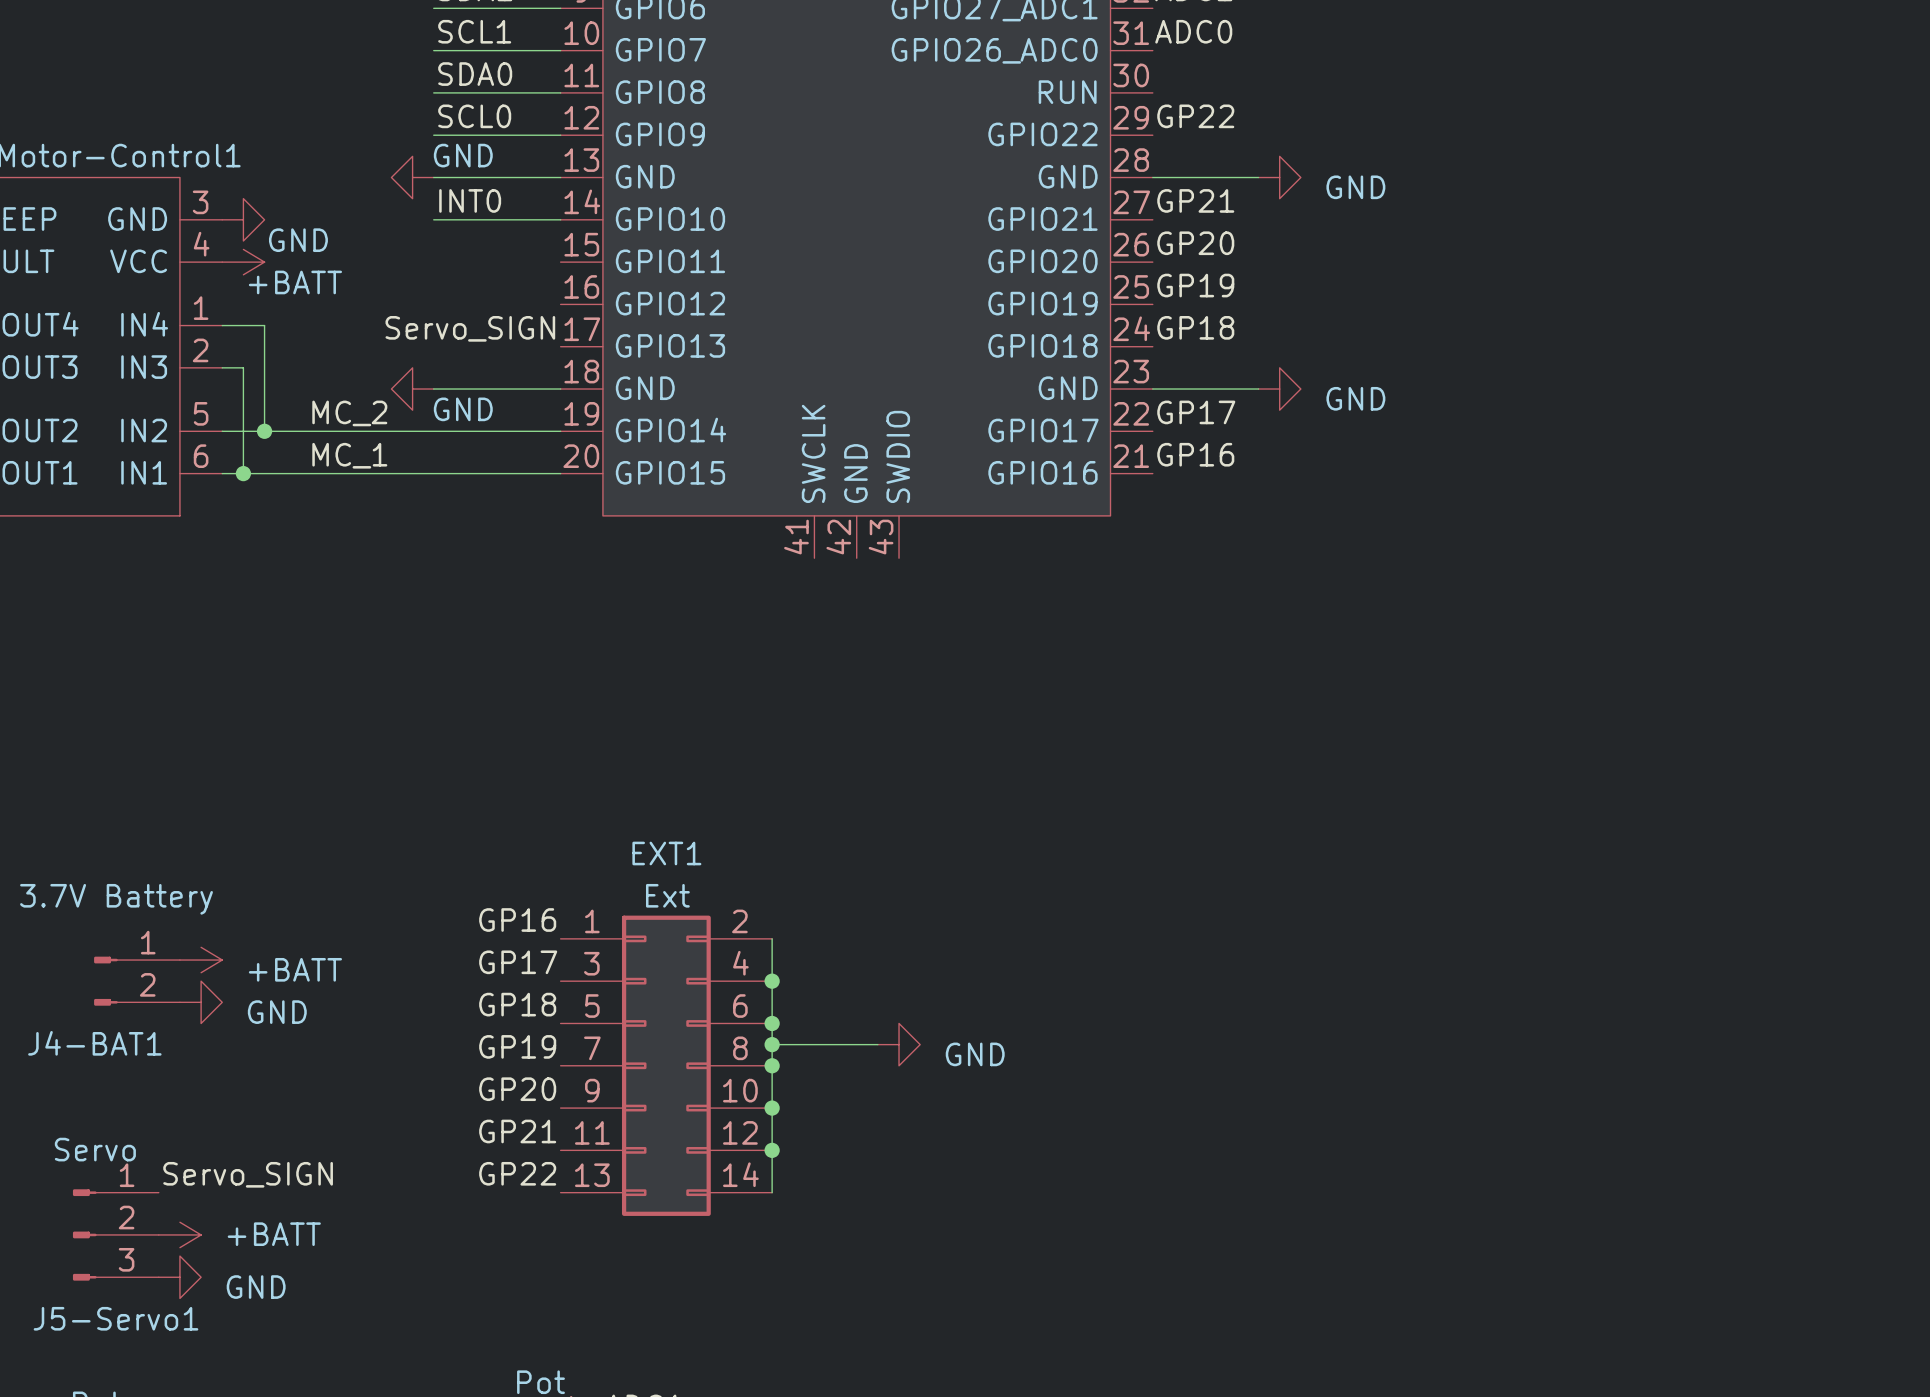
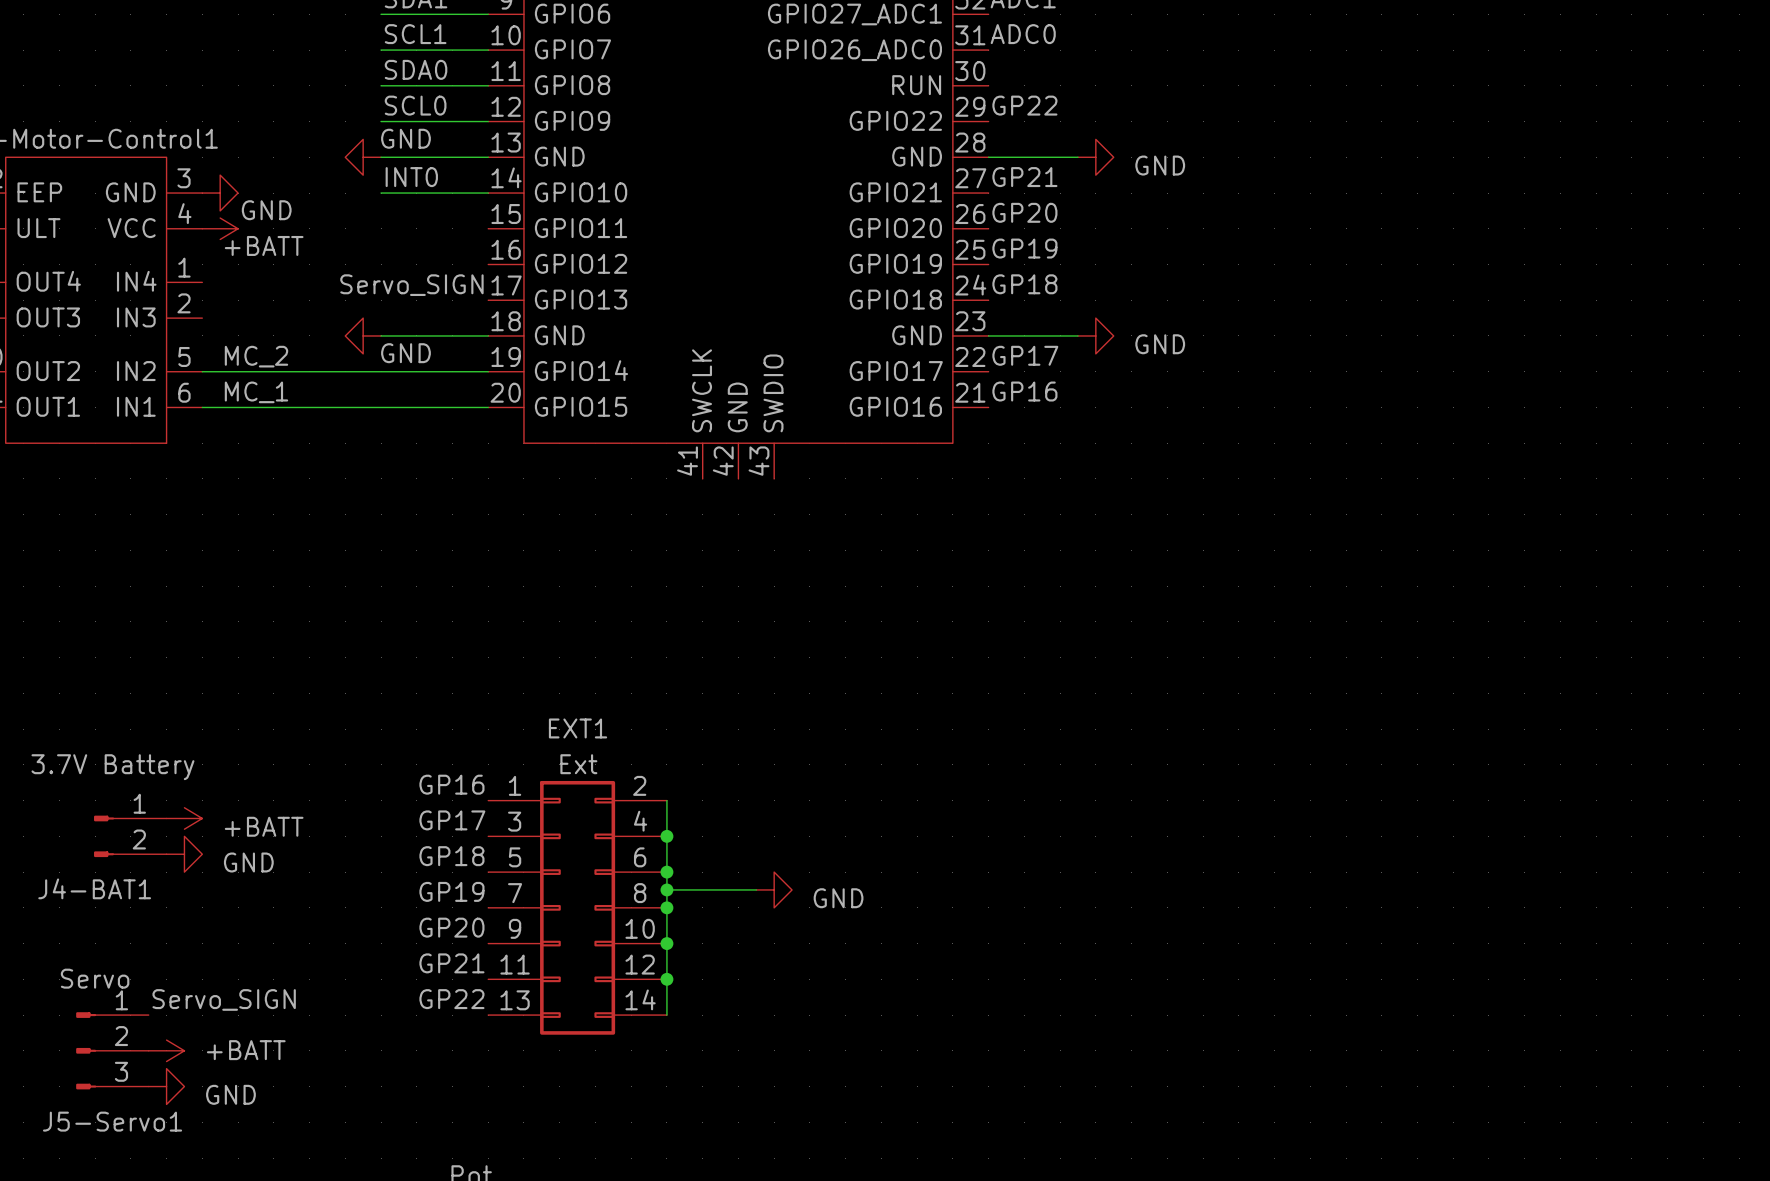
wire: (222, 325) (264, 325) (264, 431) -> none
wire: (222, 367) (243, 367) (243, 473) -> none
label position: MC_2 (349, 413) -> MC_2 (256, 356)
junction: (264, 431) -> none
label position: MC_1 (349, 455) -> MC_1 (256, 392)
junction: (243, 473) -> none

